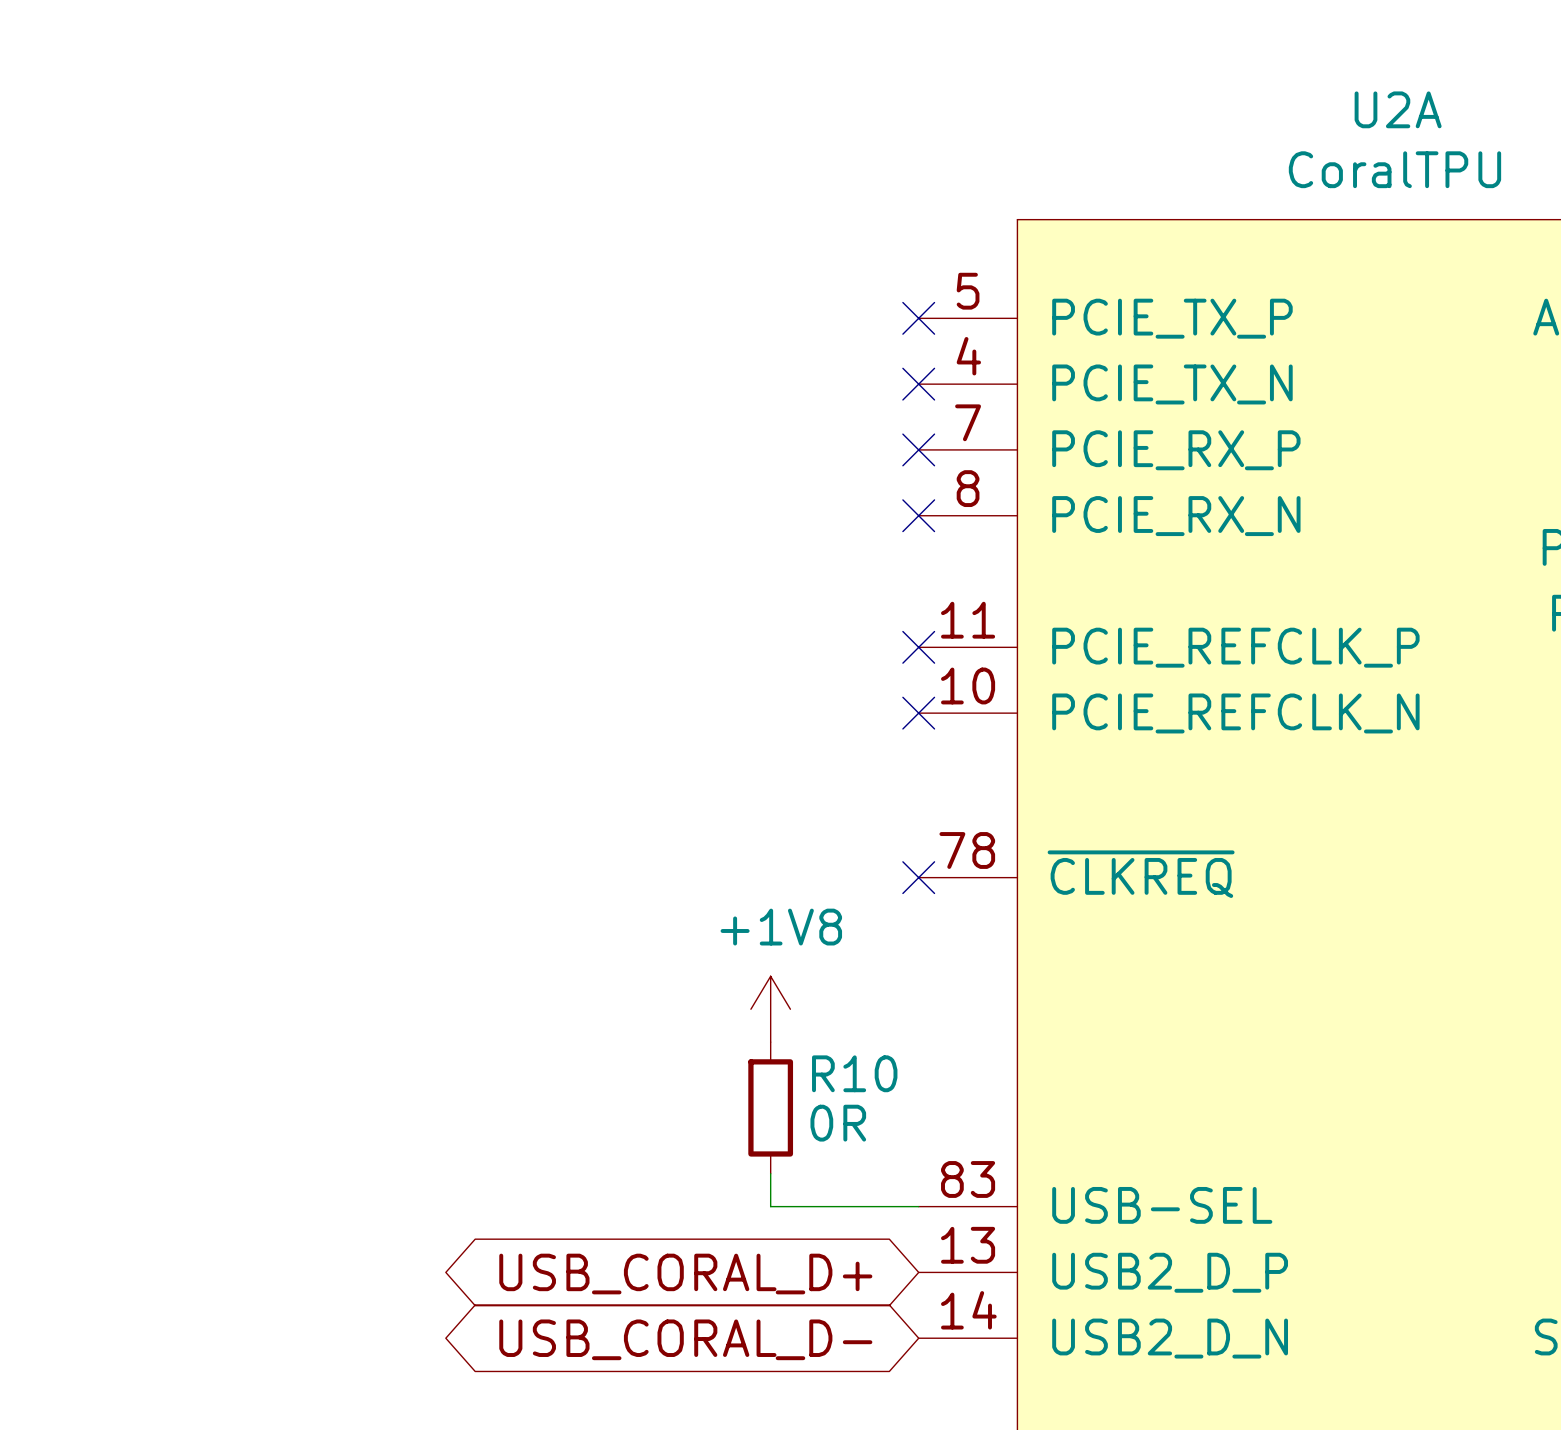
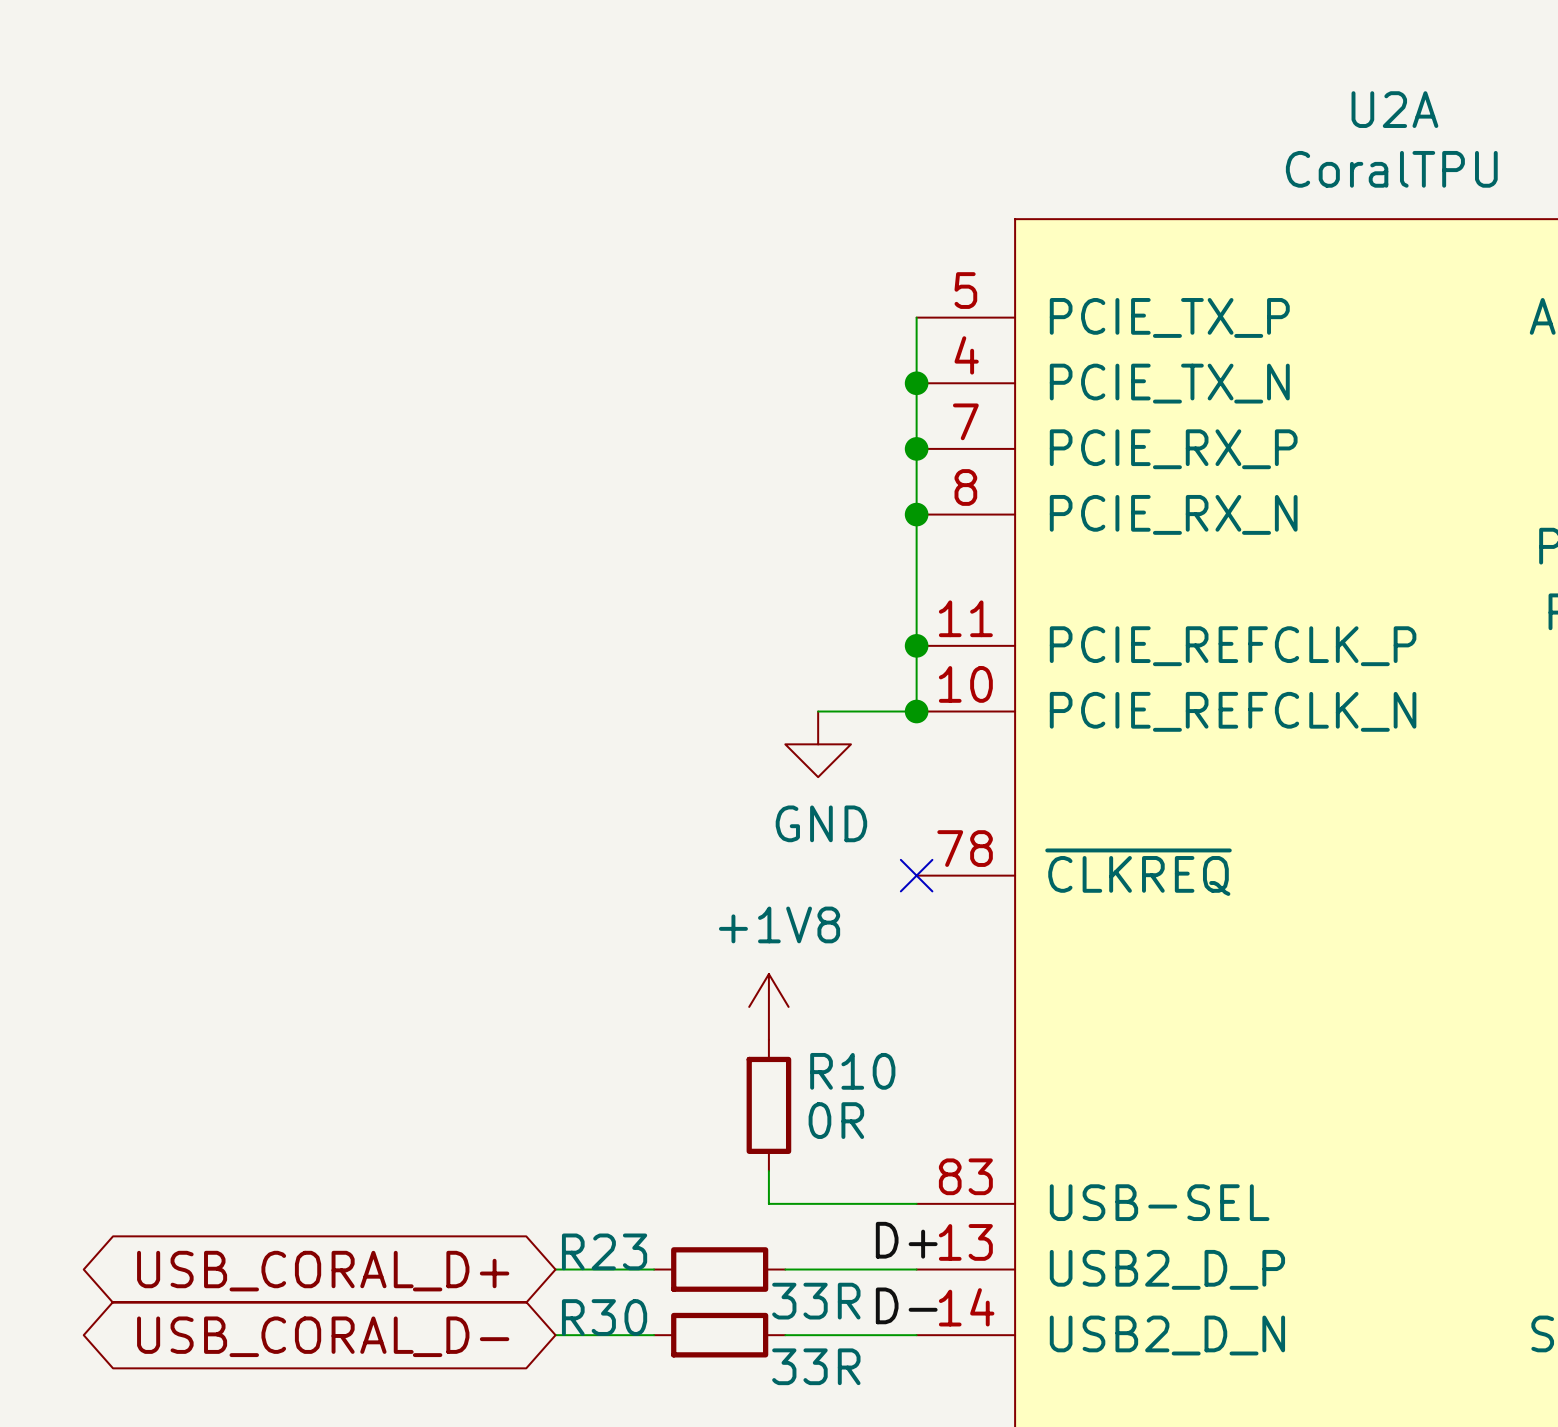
wire: none -> (916, 317) (916, 711) (818, 711)
no-connect mark: (918, 318) -> none
no-connect mark: (918, 384) -> none
junction: none -> (916, 383)
no-connect mark: (918, 449) -> none
junction: none -> (916, 448)
no-connect mark: (918, 515) -> none
junction: none -> (916, 514)
no-connect mark: (918, 647) -> none
junction: none -> (916, 645)
no-connect mark: (918, 713) -> none
junction: none -> (916, 711)
power symbol: none -> GND (818, 744)
label: none -> D+ (906, 1240)
wire: none -> (555, 1269) (654, 1269)
R23: none -> 33R (719, 1269)
wire: none -> (785, 1269) (916, 1269)
global label position: USB_CORAL_D+ (685, 1274) -> USB_CORAL_D+ (323, 1271)
label: none -> D- (906, 1305)
wire: none -> (555, 1335) (654, 1335)
R30: none -> 33R (719, 1335)
wire: none -> (785, 1335) (916, 1335)
global label position: USB_CORAL_D- (685, 1339) -> USB_CORAL_D- (323, 1336)

